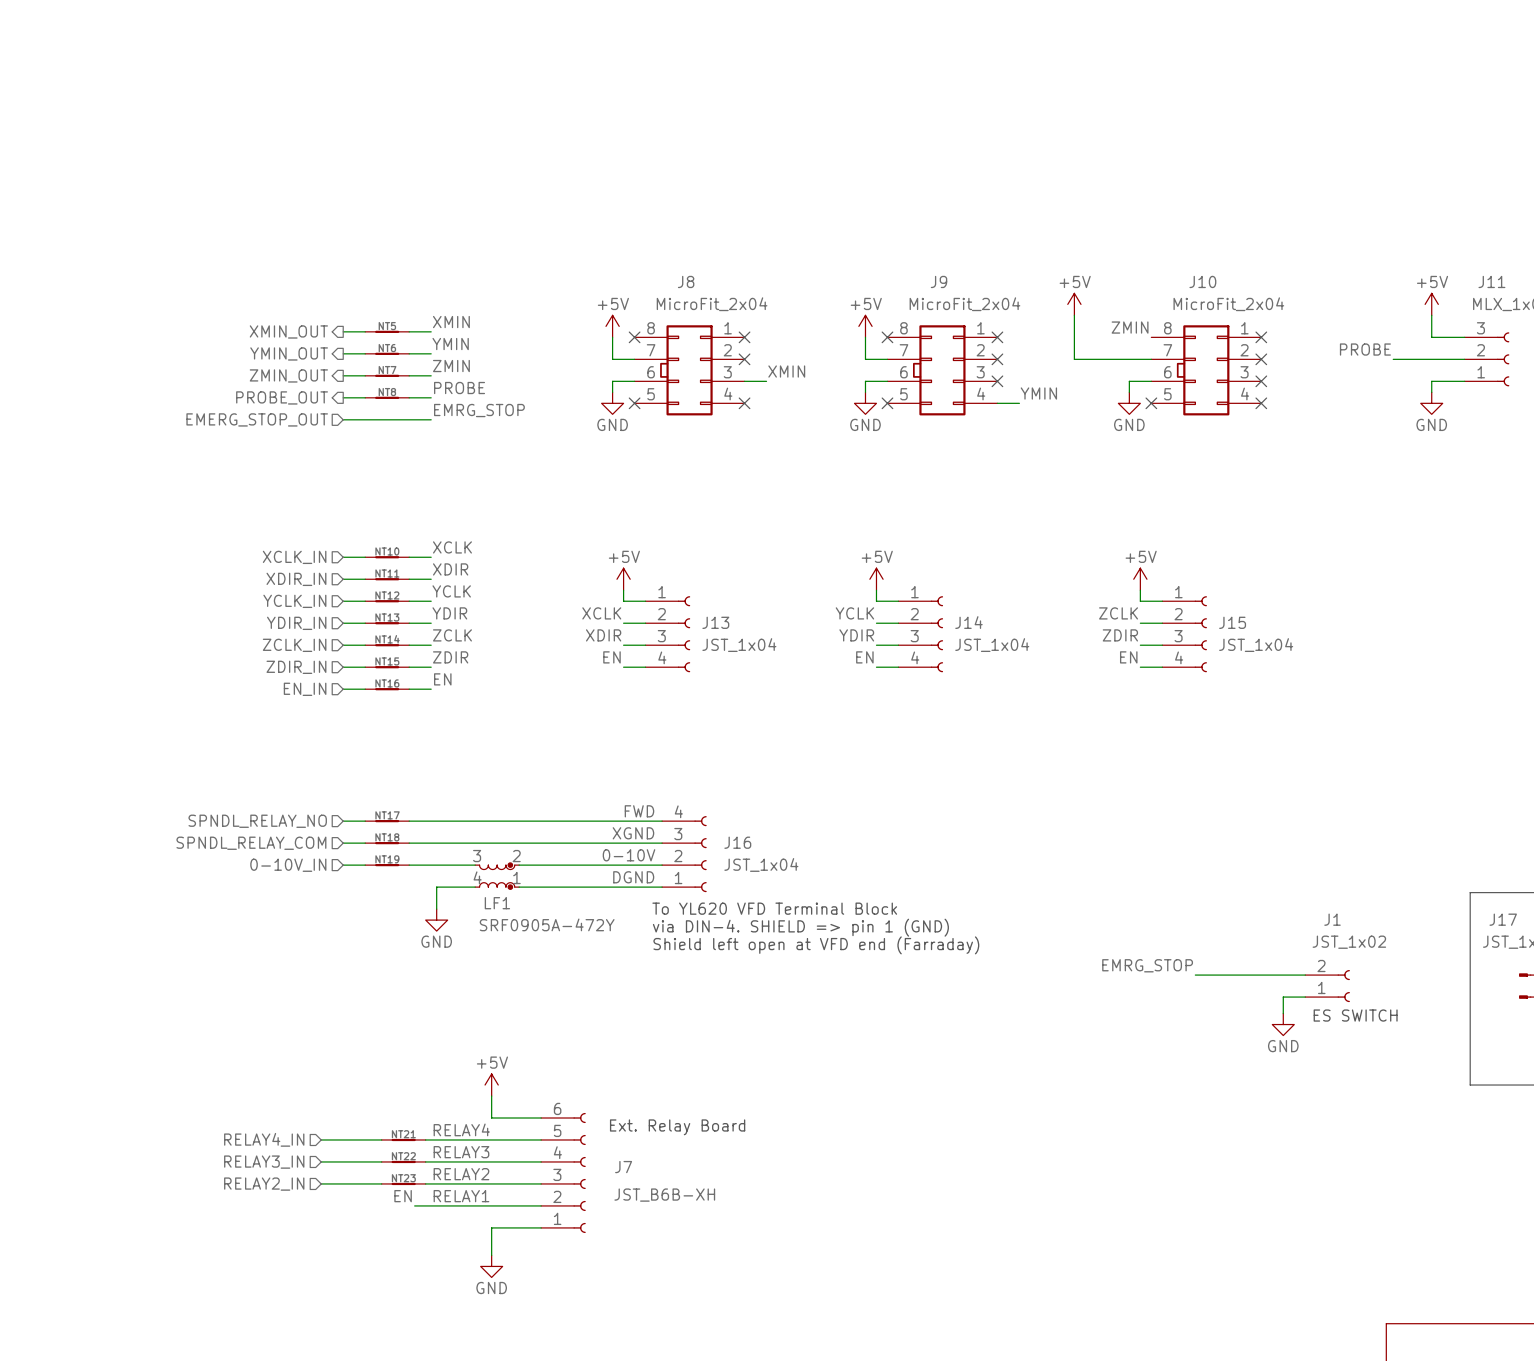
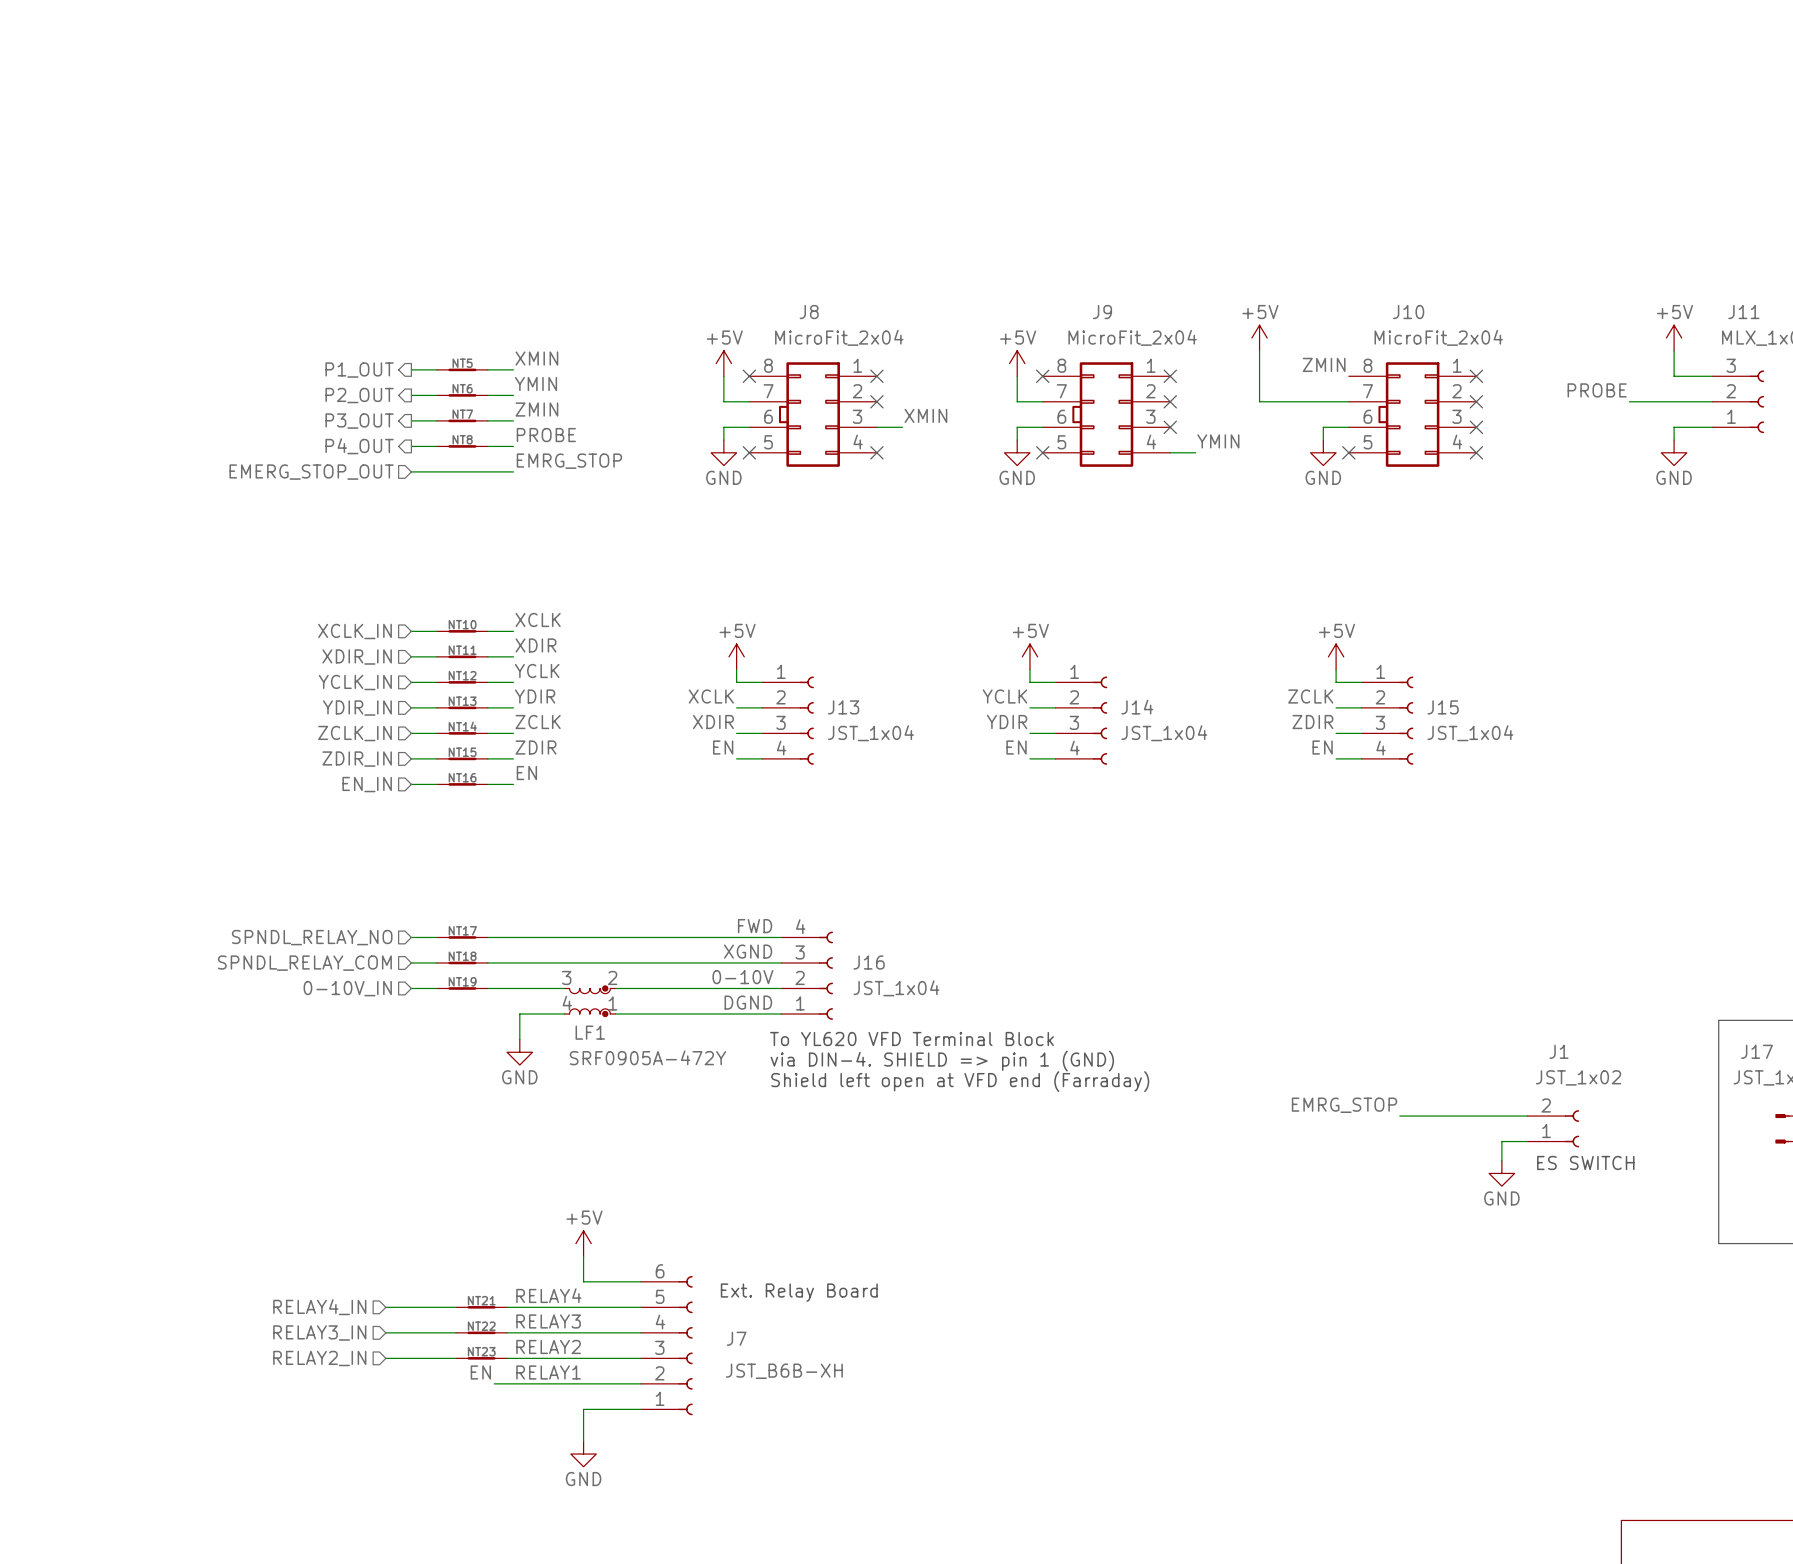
hierarchical label: XMIN_OUT (288, 331) -> P1_OUT (359, 370)
hierarchical label: YMIN_OUT (289, 353) -> P2_OUT (359, 395)
hierarchical label: ZMIN_OUT (288, 375) -> P3_OUT (359, 421)
hierarchical label: PROBE_OUT (282, 397) -> P4_OUT (359, 446)

